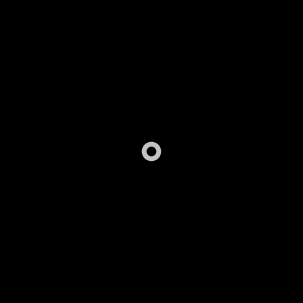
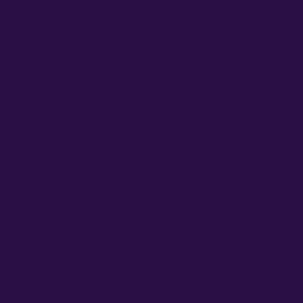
via: (151, 151) -> none

